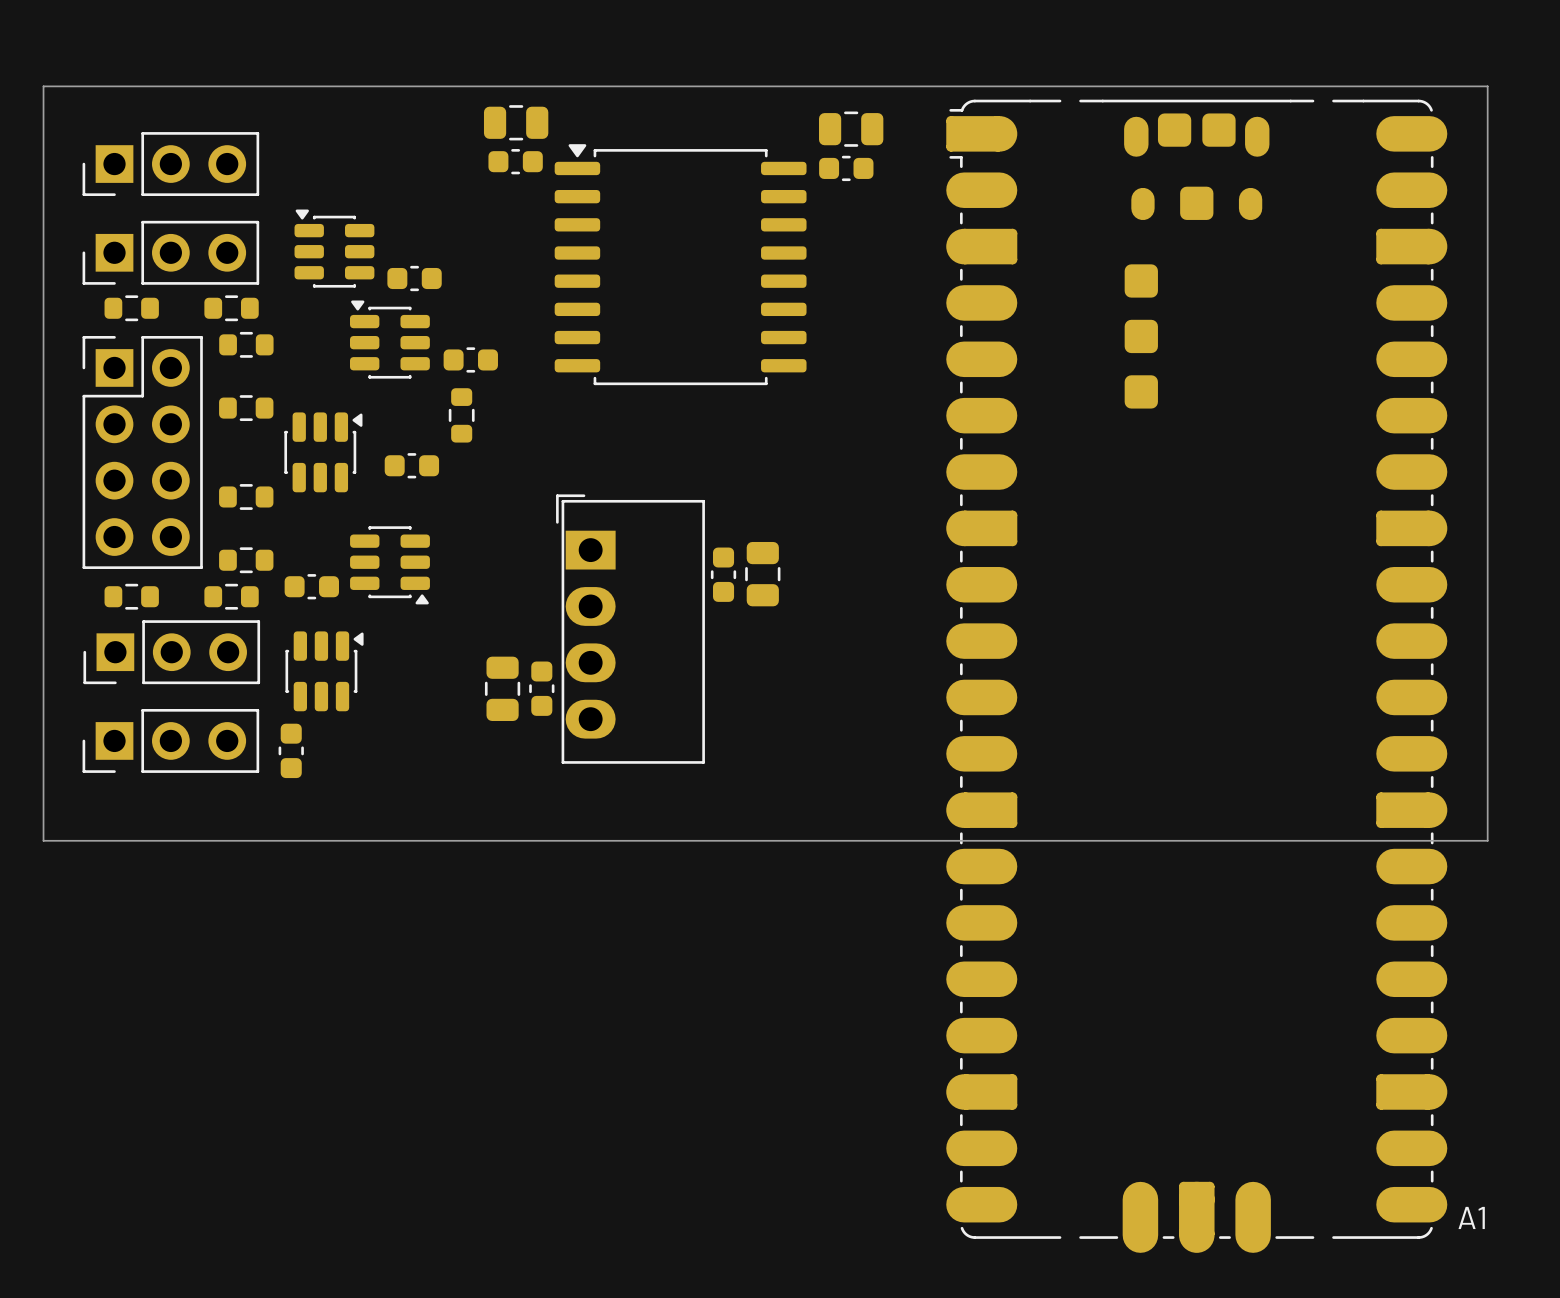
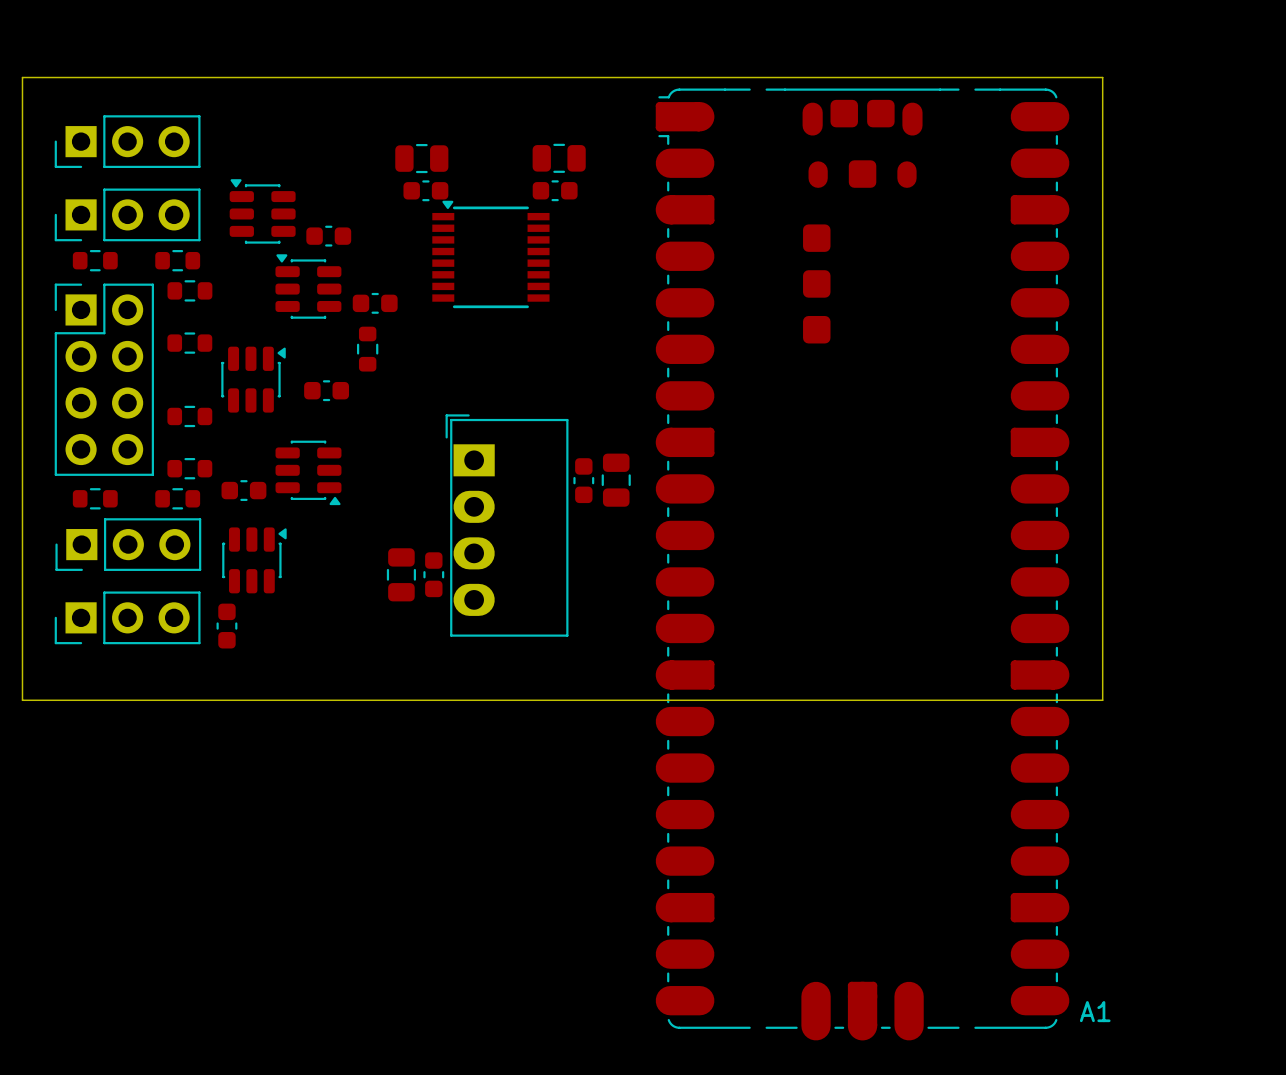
board edge: (1352, 86) (1487, 86) (1487, 840) (1352, 840) -> (1102, 77) (1102, 700)
part position: (516, 122) -> (421, 158)
part: (851, 129) -> none
part position: (515, 161) -> (425, 190)
part: (846, 168) -> none
part: none -> (559, 158)
part: none -> (555, 190)
part: (680, 264) -> none
part: none -> (490, 254)
A1 position: (1196, 676) -> (862, 564)

